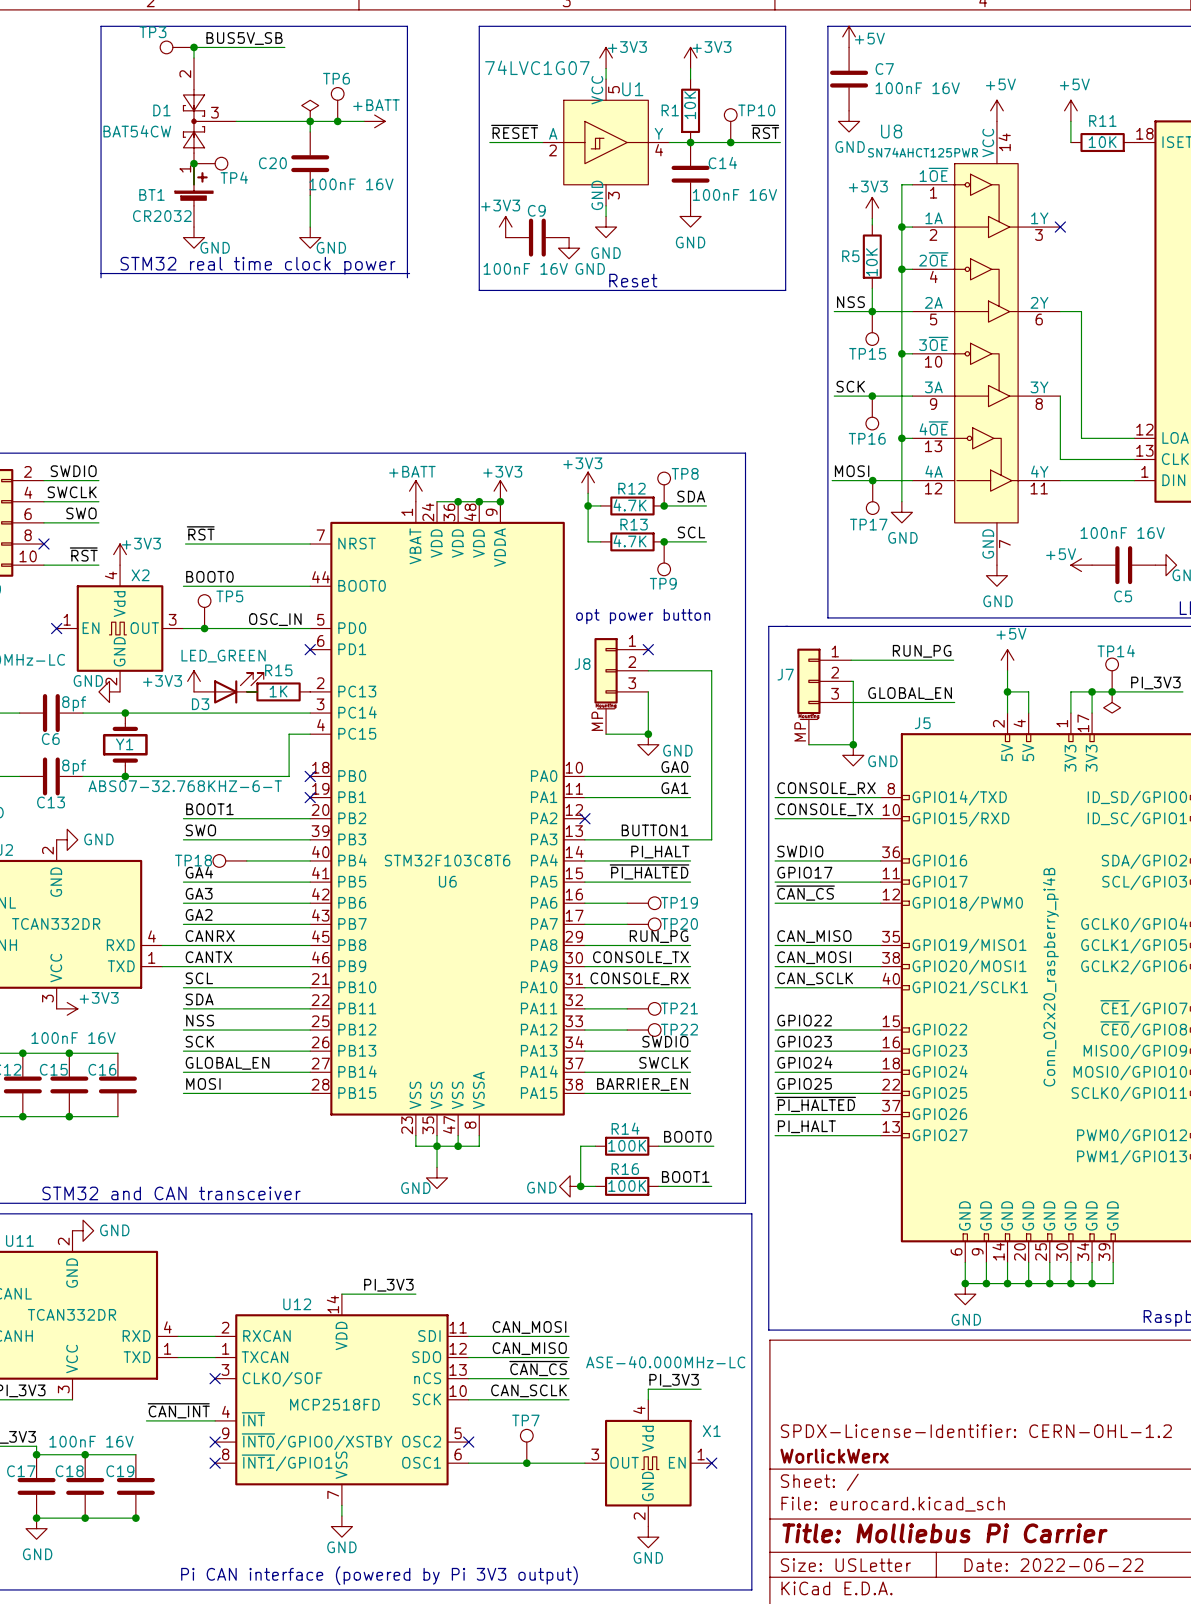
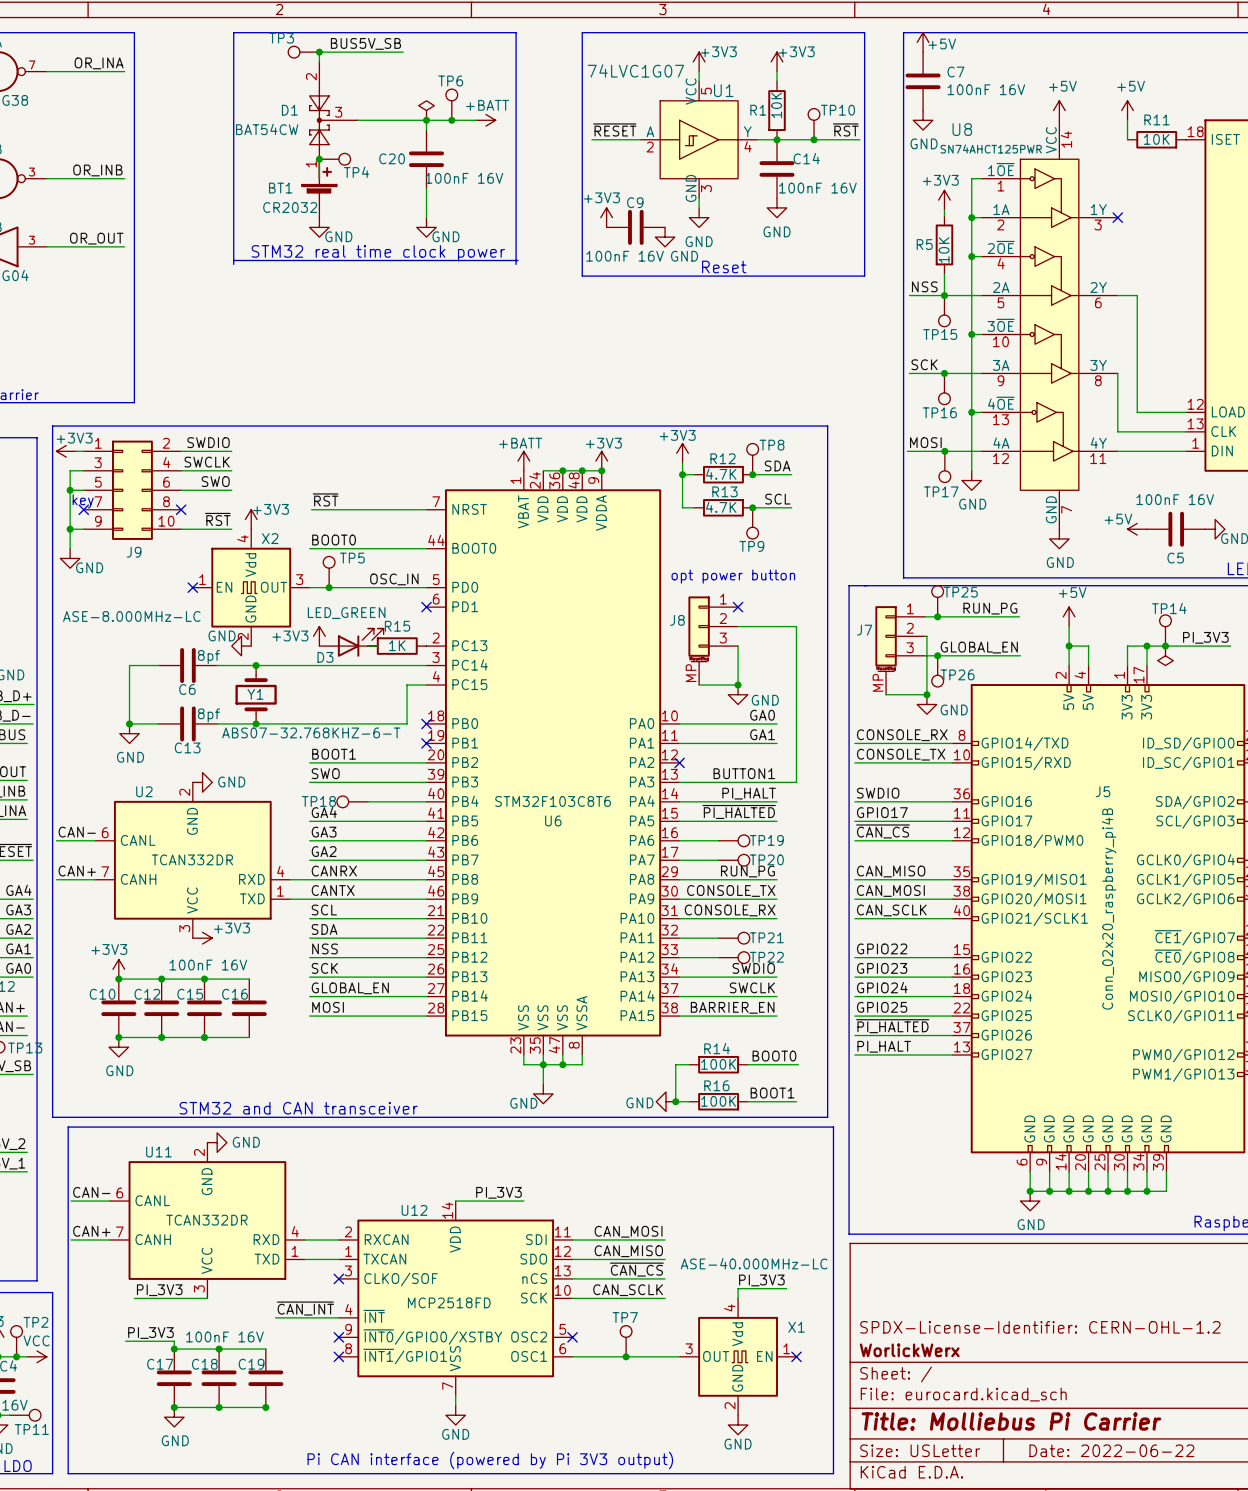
TP25: none -> (937, 601)
junction: none -> (937, 616)
junction: none -> (937, 655)
TP26: none -> (937, 671)
J5 name position: J5 (922, 723) -> J5 (1102, 791)

